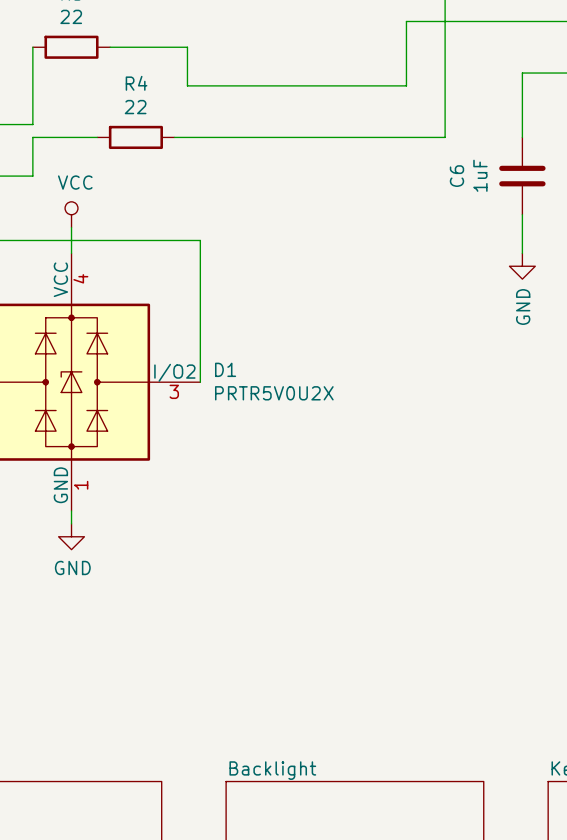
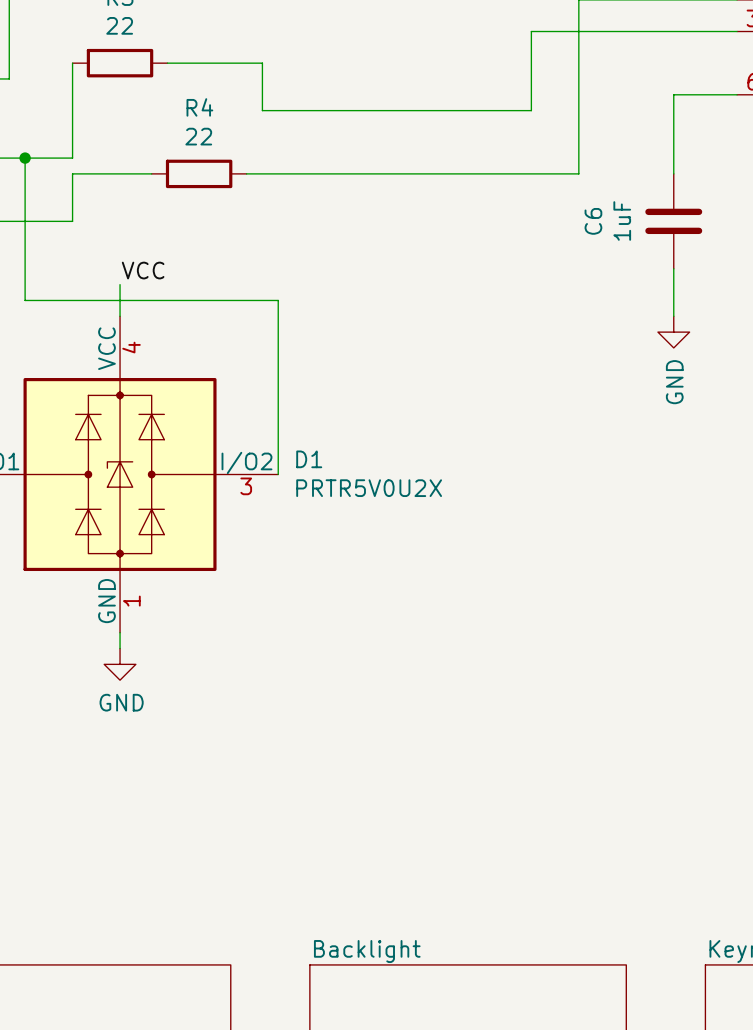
power symbol: VCC (71, 214) -> none
label: none -> VCC (143, 270)

